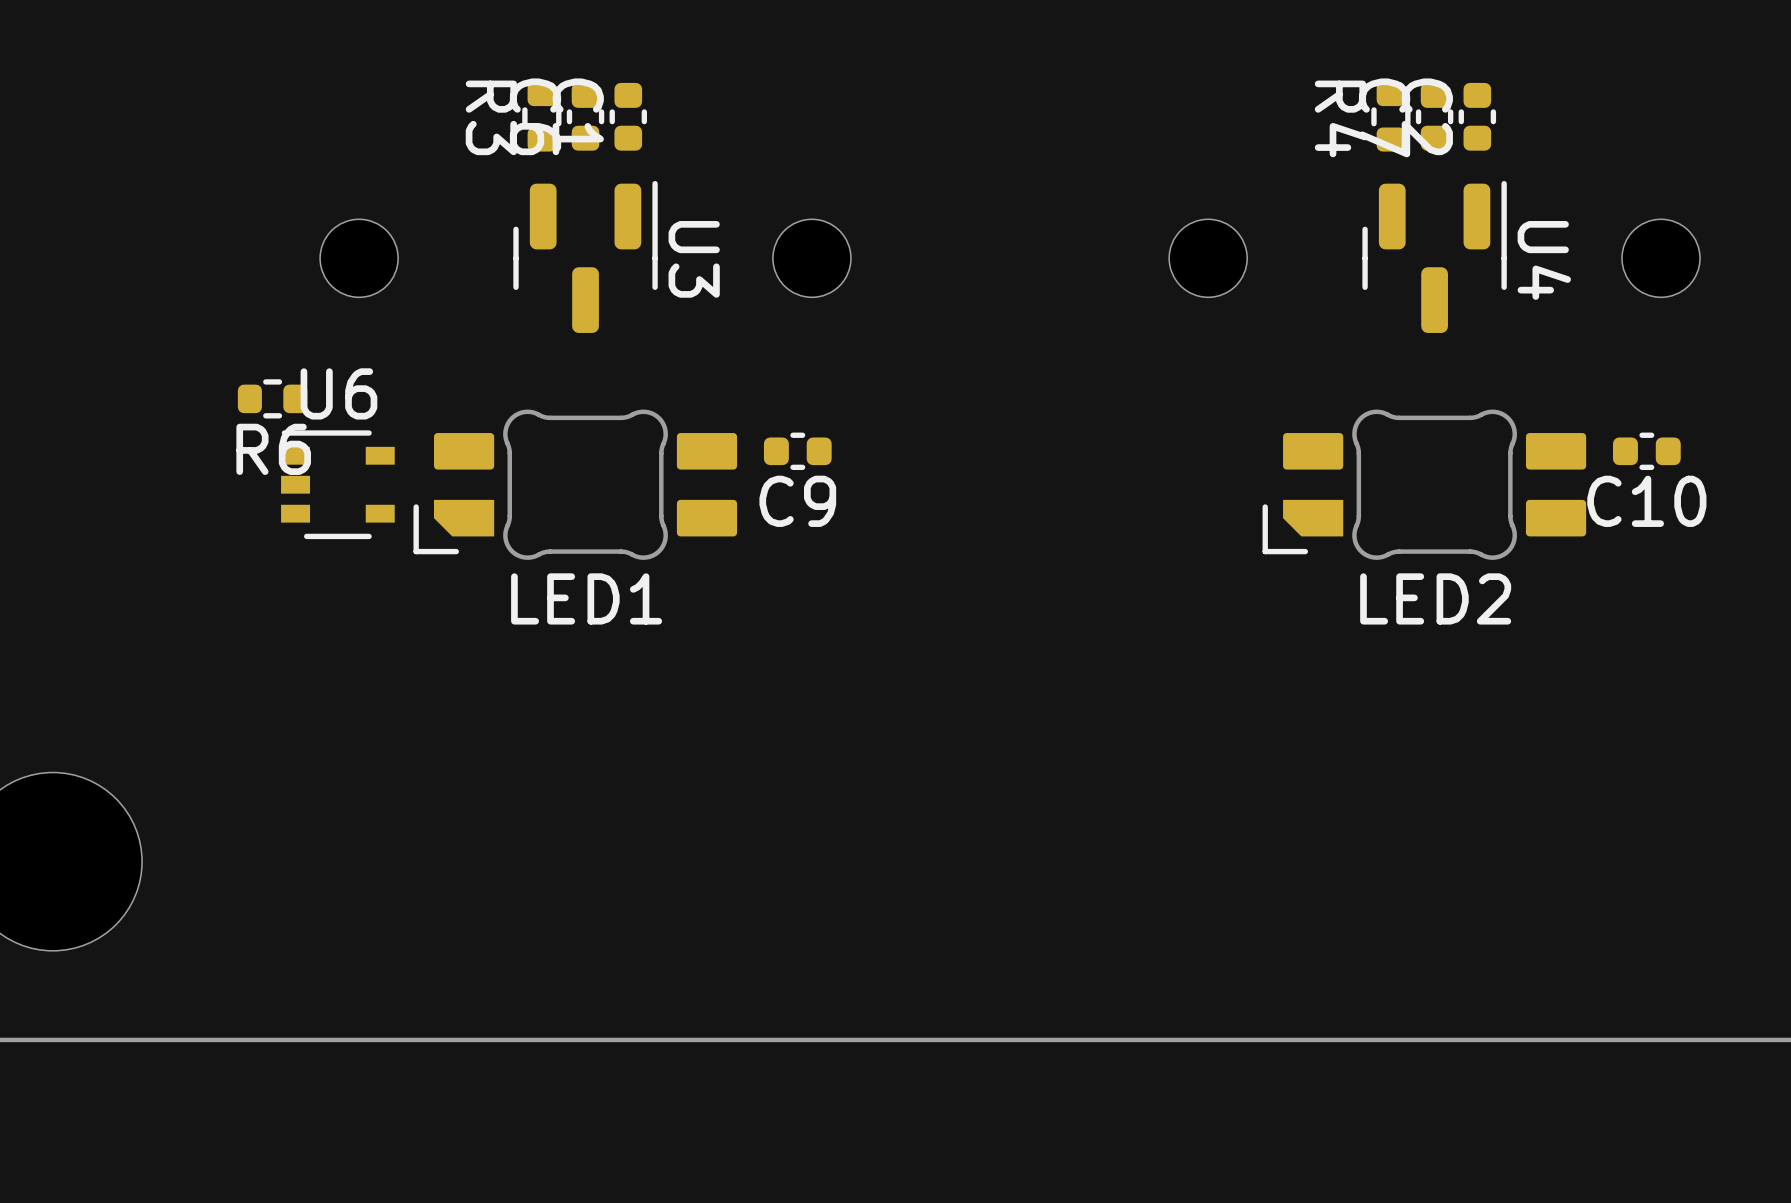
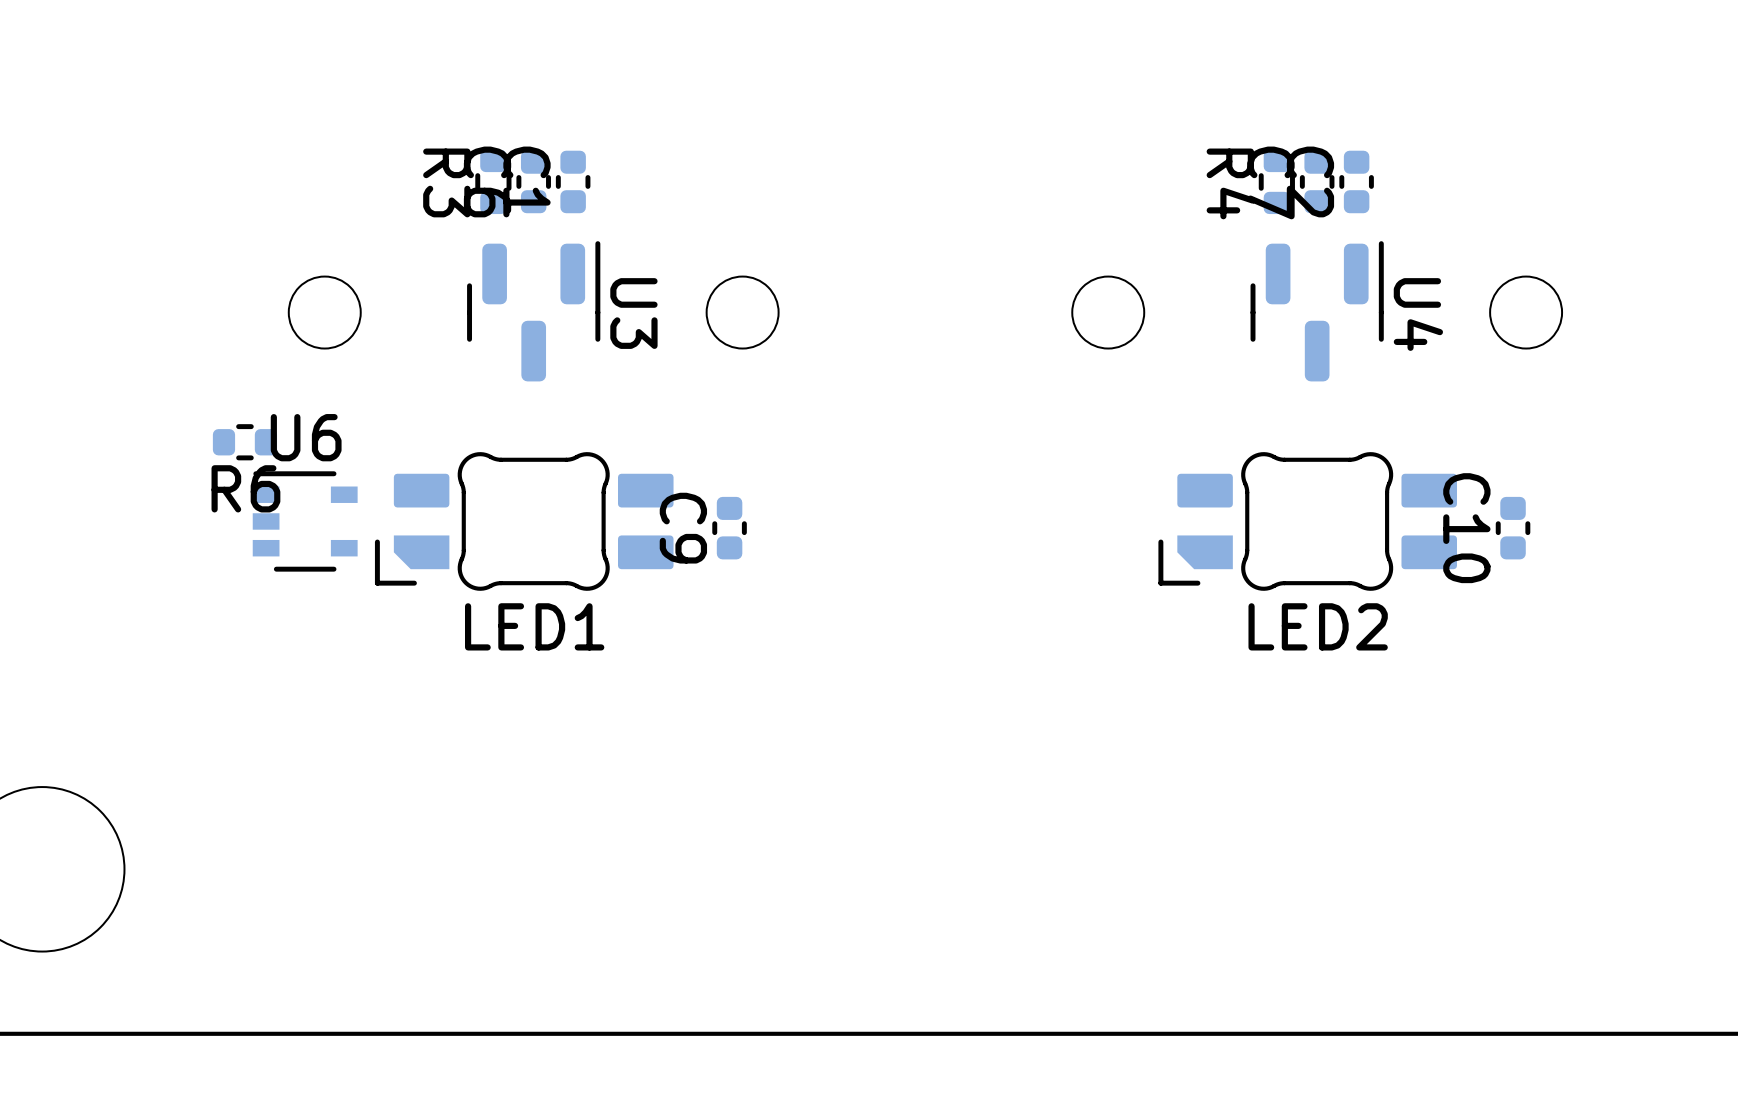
C9 rotation: 0° (797, 451) -> 90° clockwise (729, 528)
C9 position: (797, 451) -> (729, 528)
C10 rotation: 0° (1646, 451) -> 90° clockwise (1513, 528)
C10 position: (1646, 451) -> (1513, 528)

